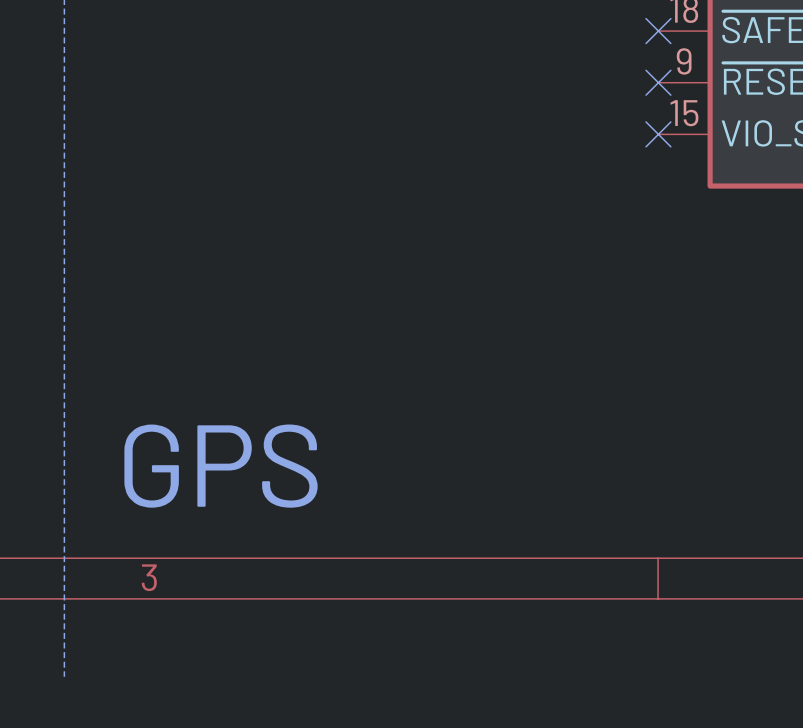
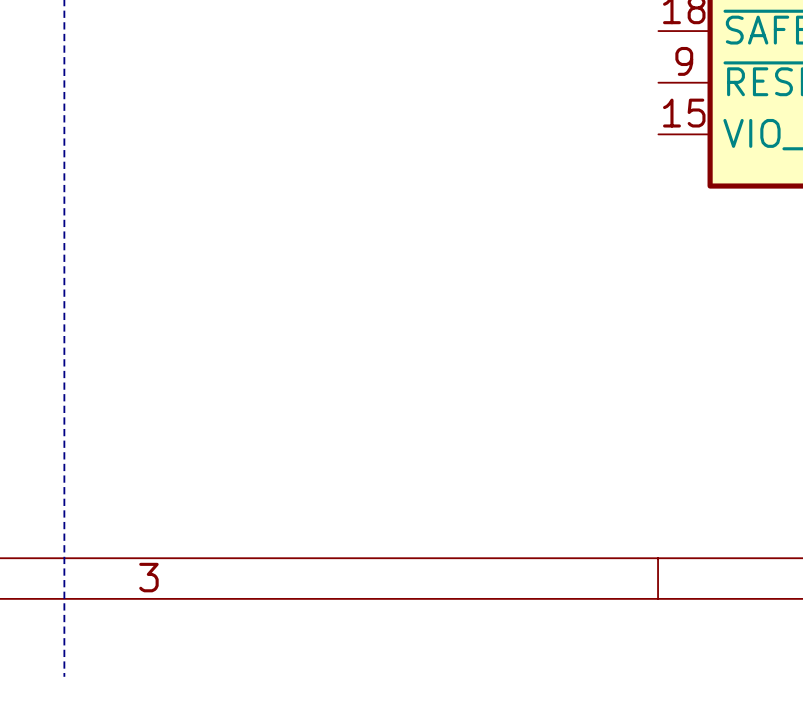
no-connect mark: (658, 31) -> none
no-connect mark: (658, 82) -> none
no-connect mark: (658, 134) -> none
text: GPS (221, 466) -> none

